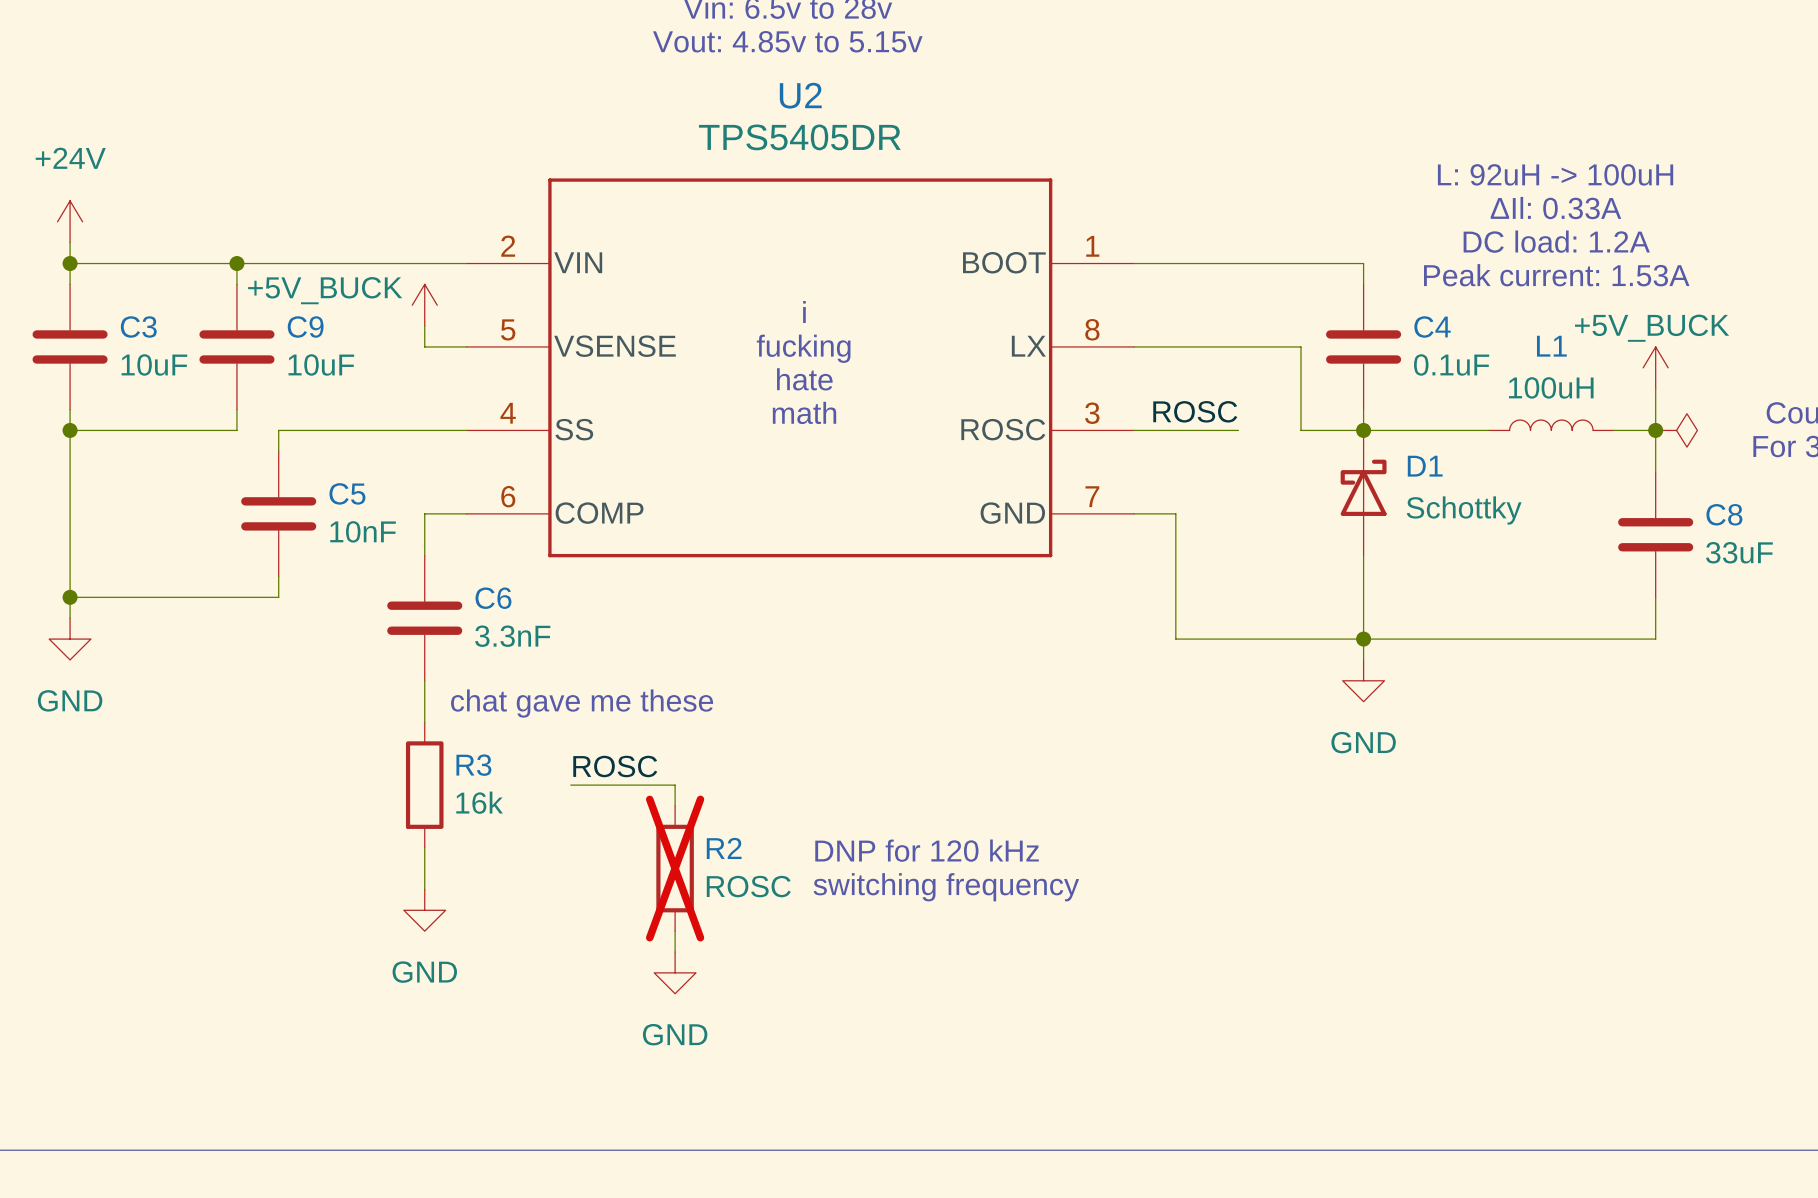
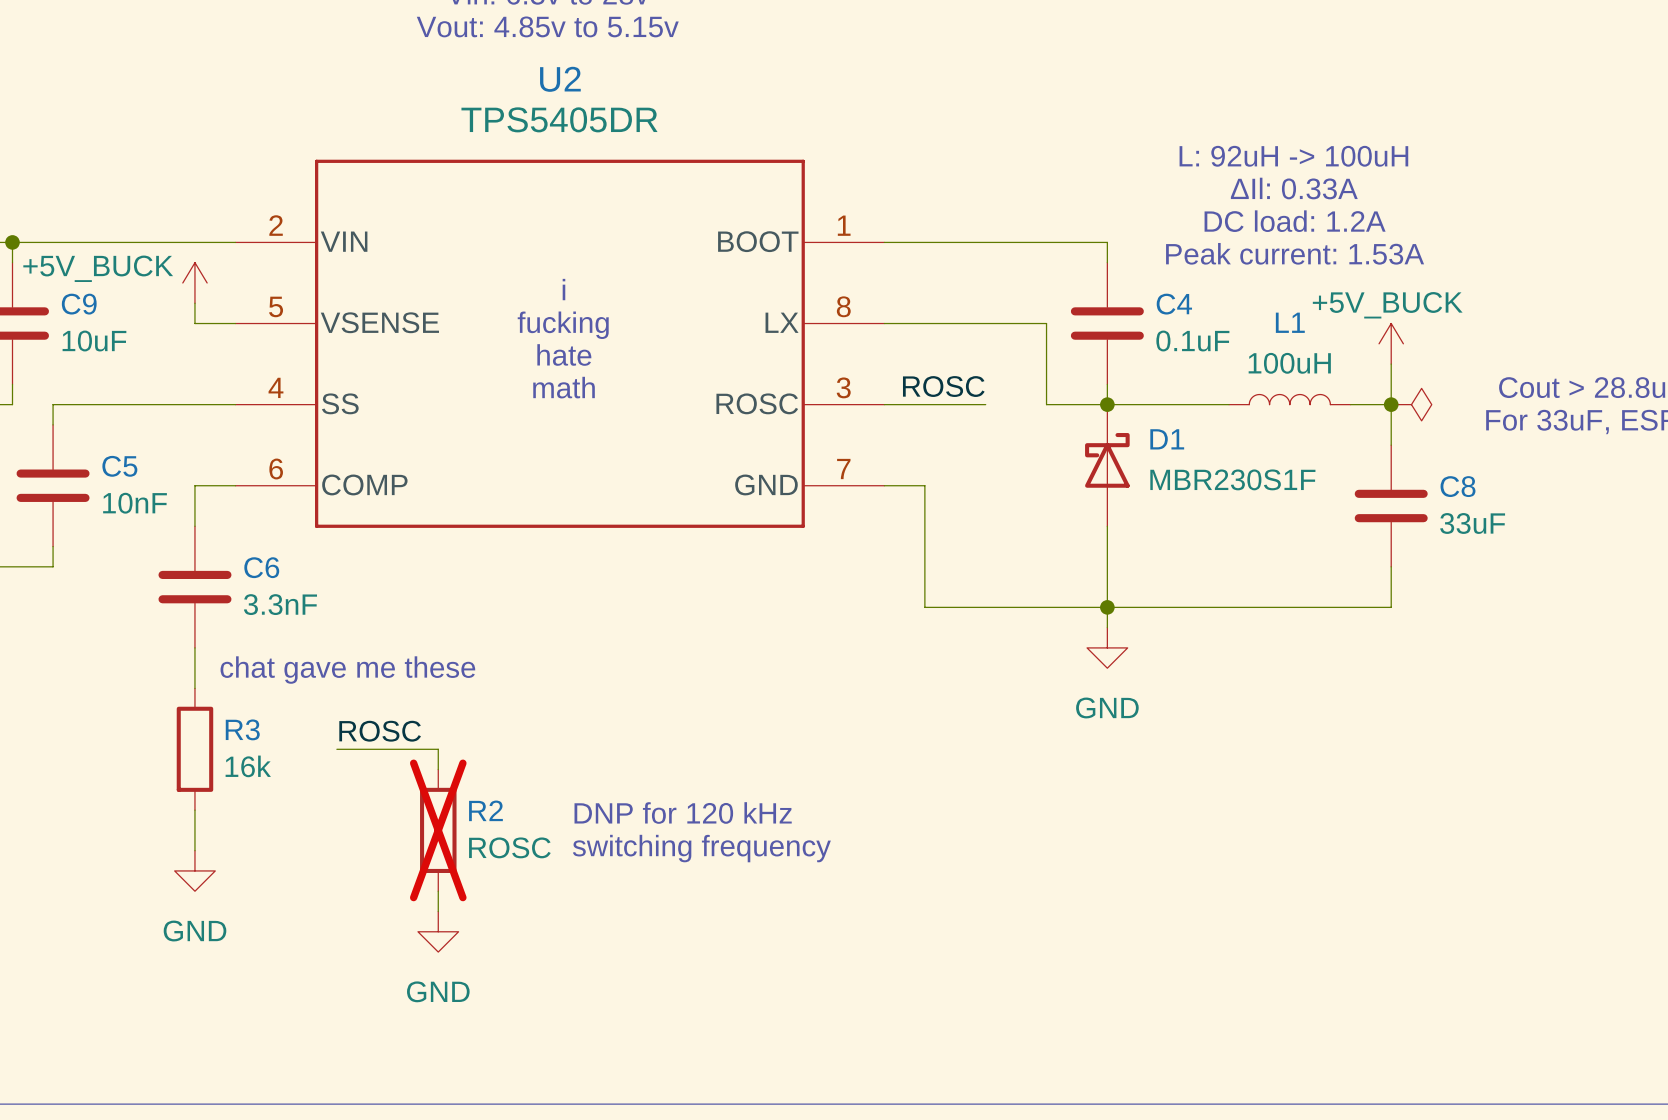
D1 value: Schottky (1464, 510) -> MBR230S1F (1232, 479)

